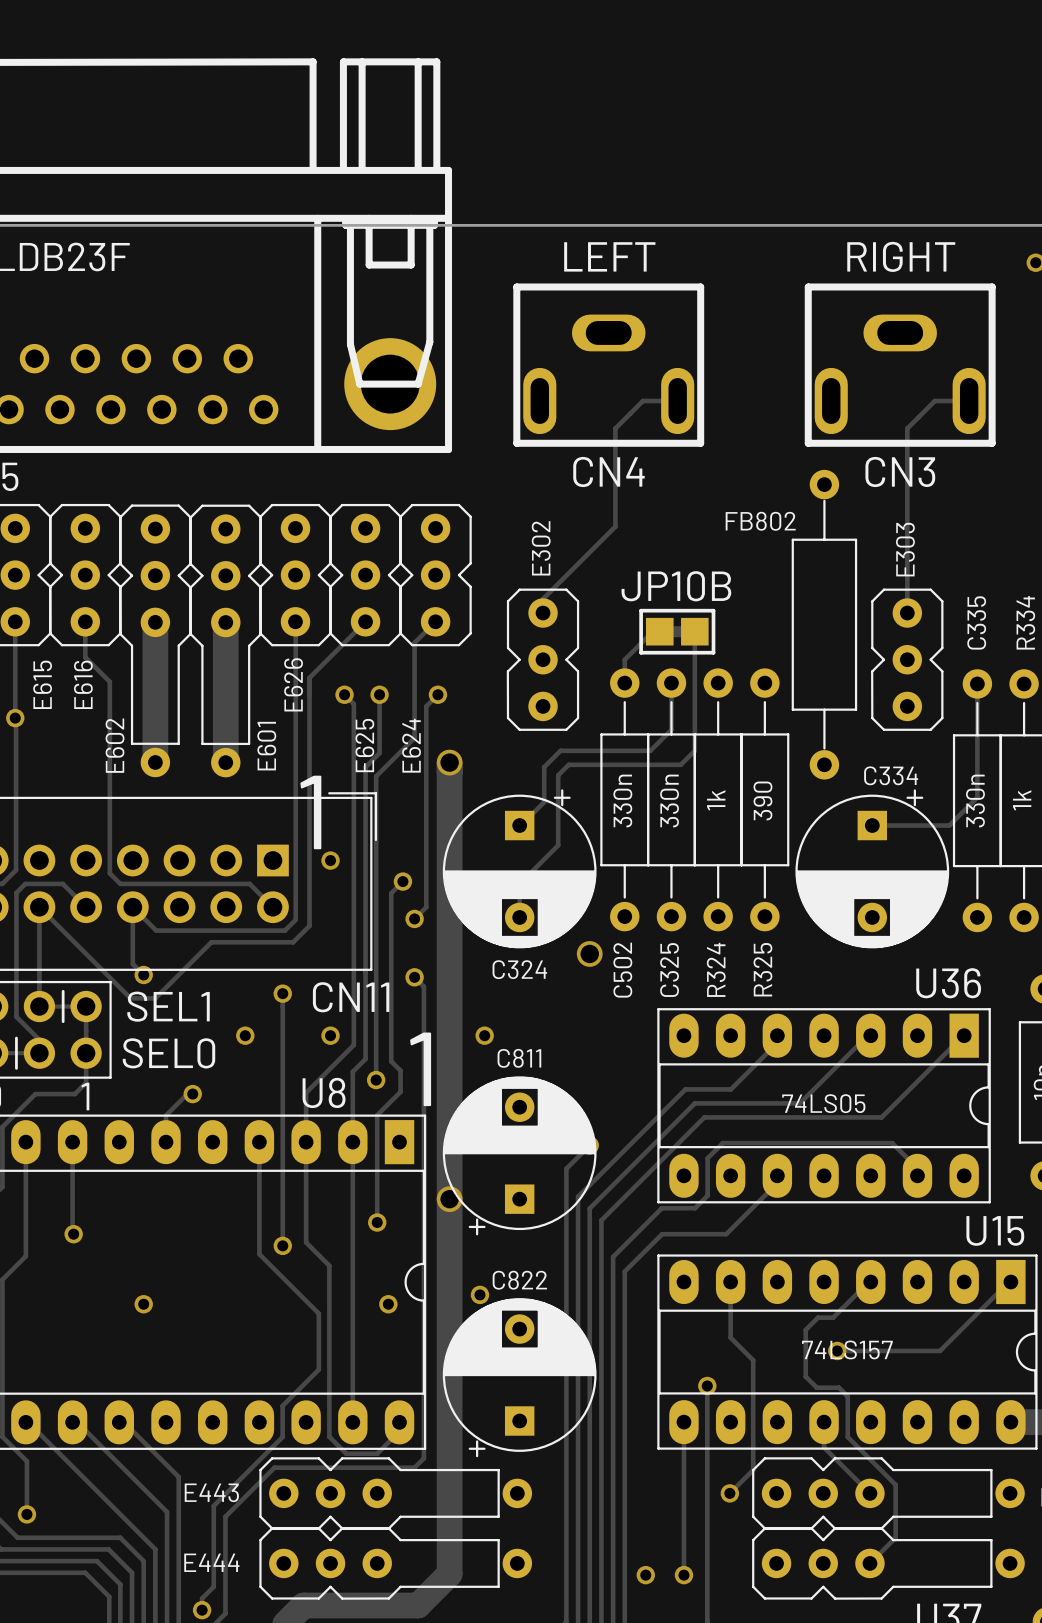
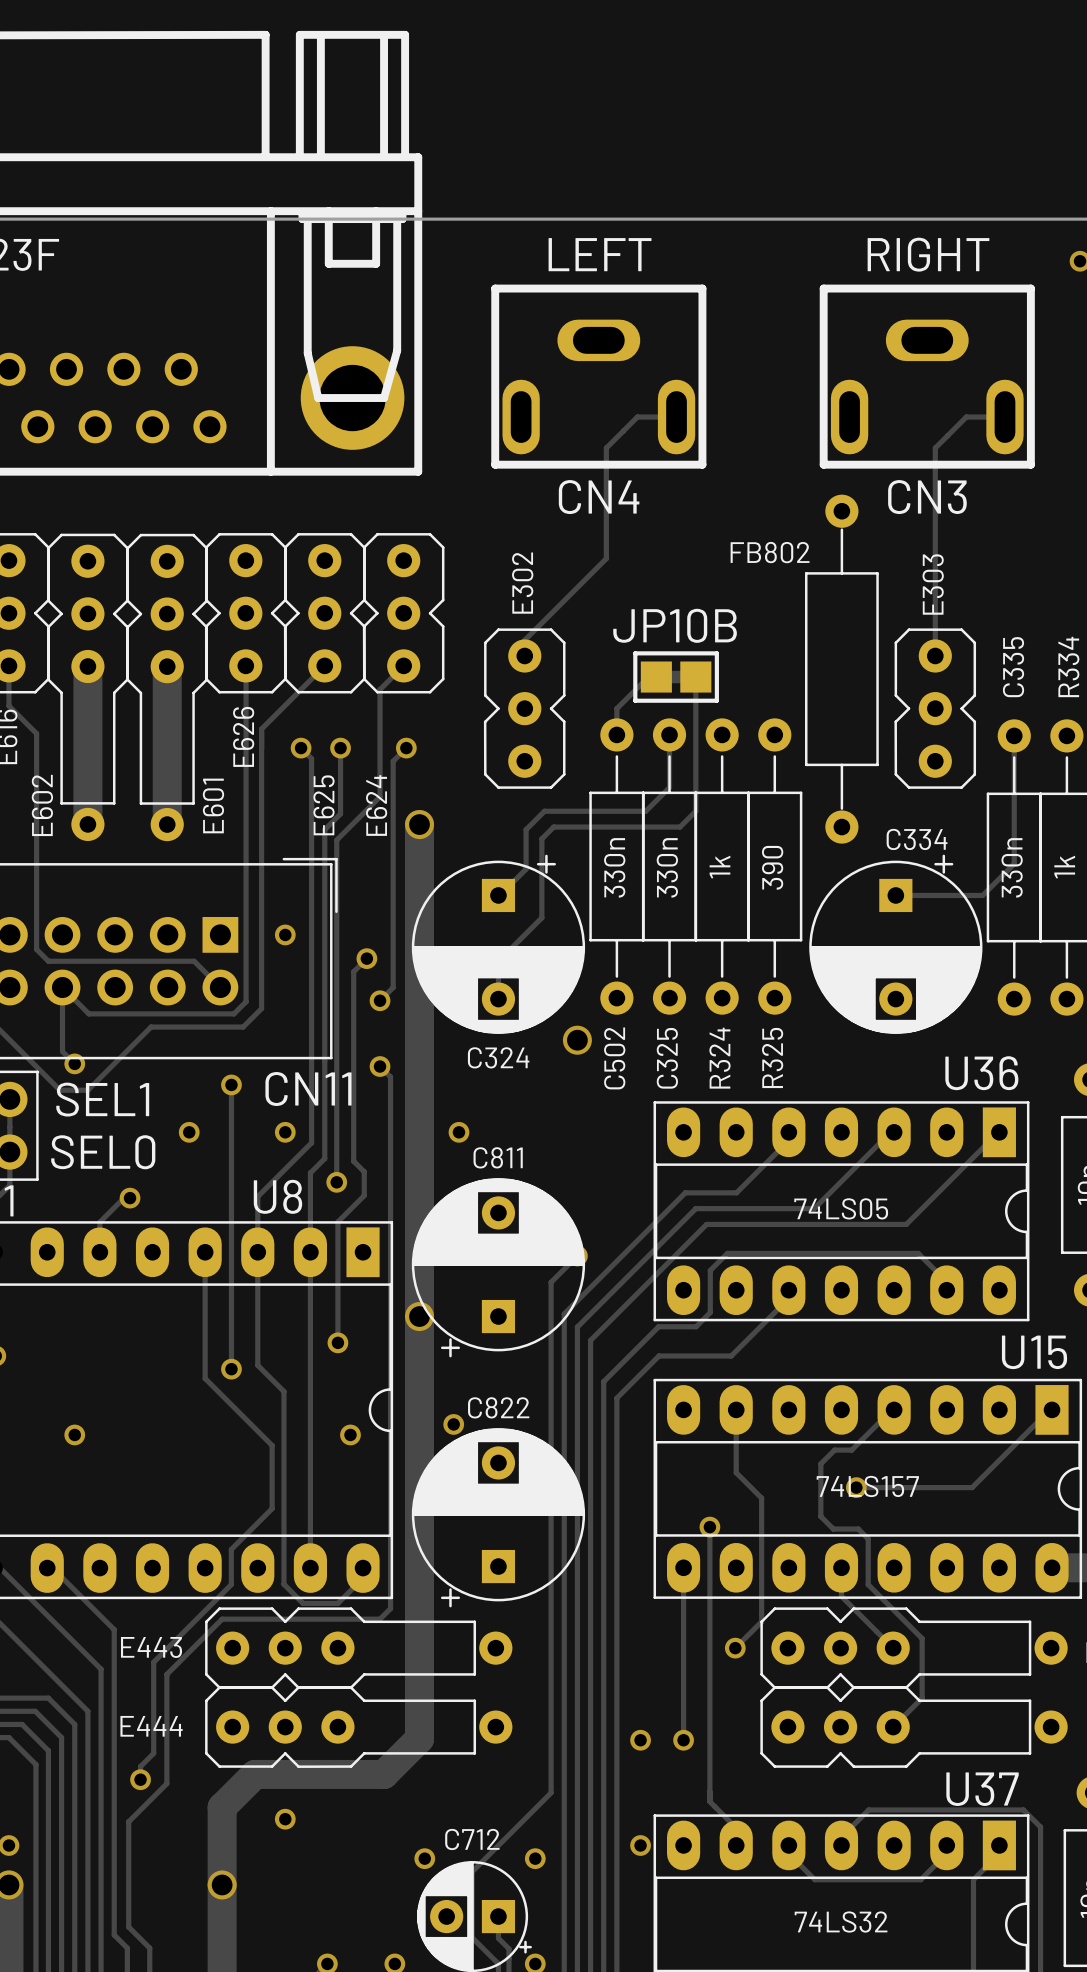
text: 1 (310, 812) -> none
text: 1 (420, 1069) -> none

